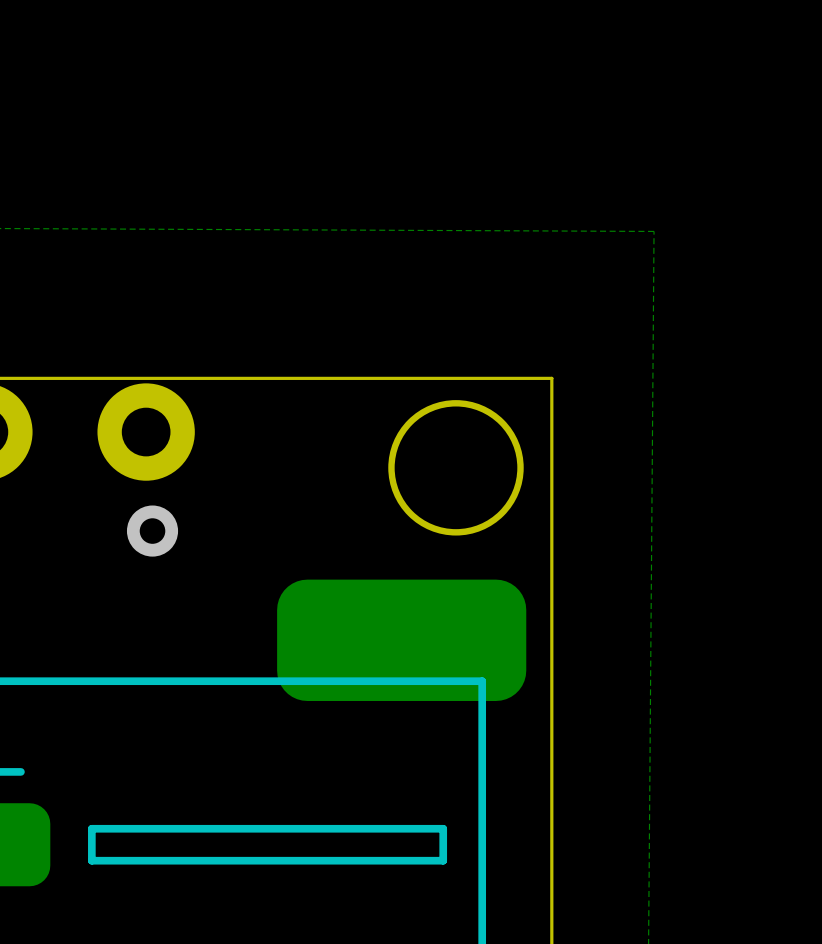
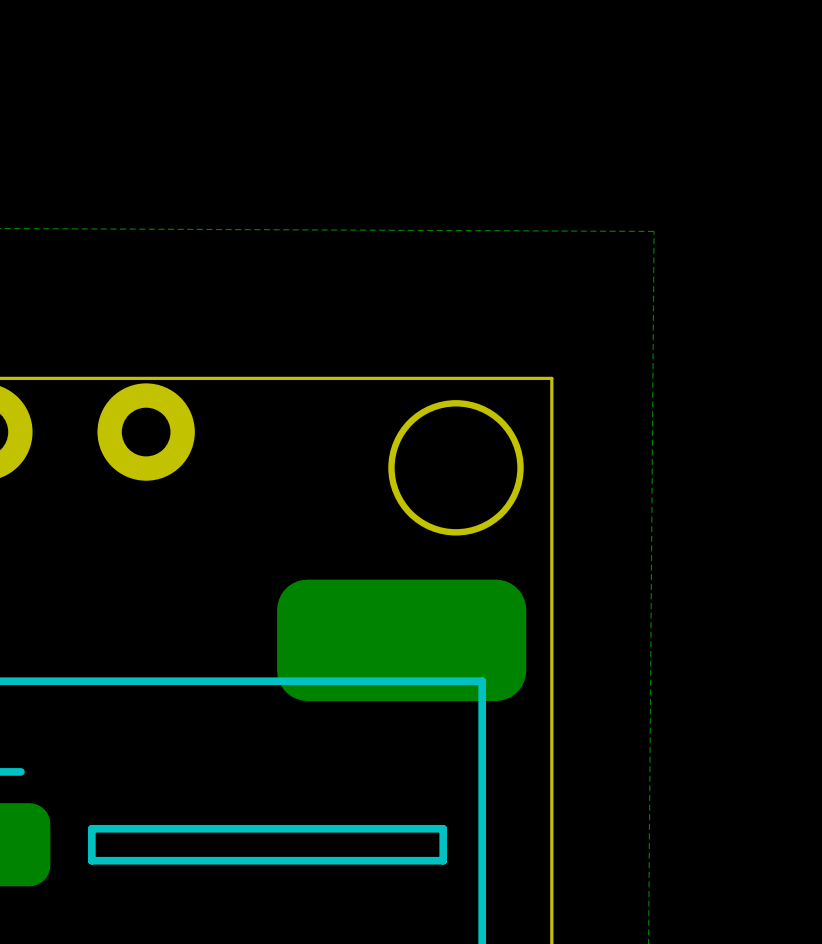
via: (152, 531) -> none

